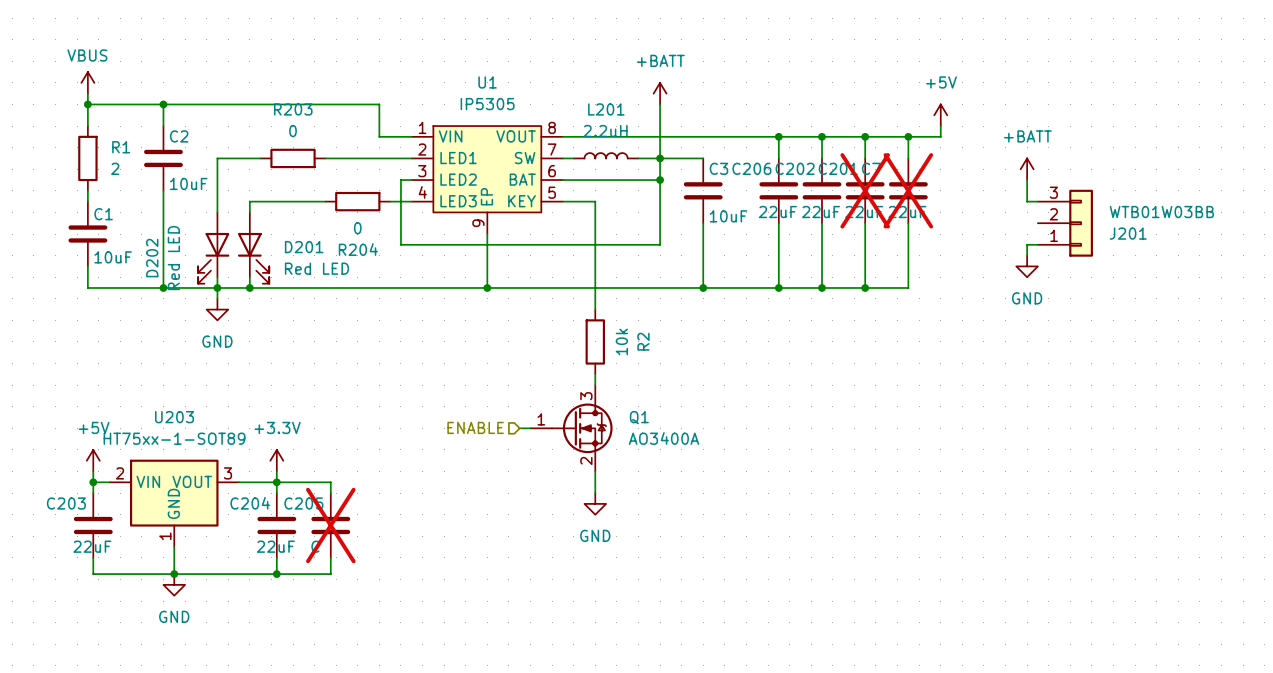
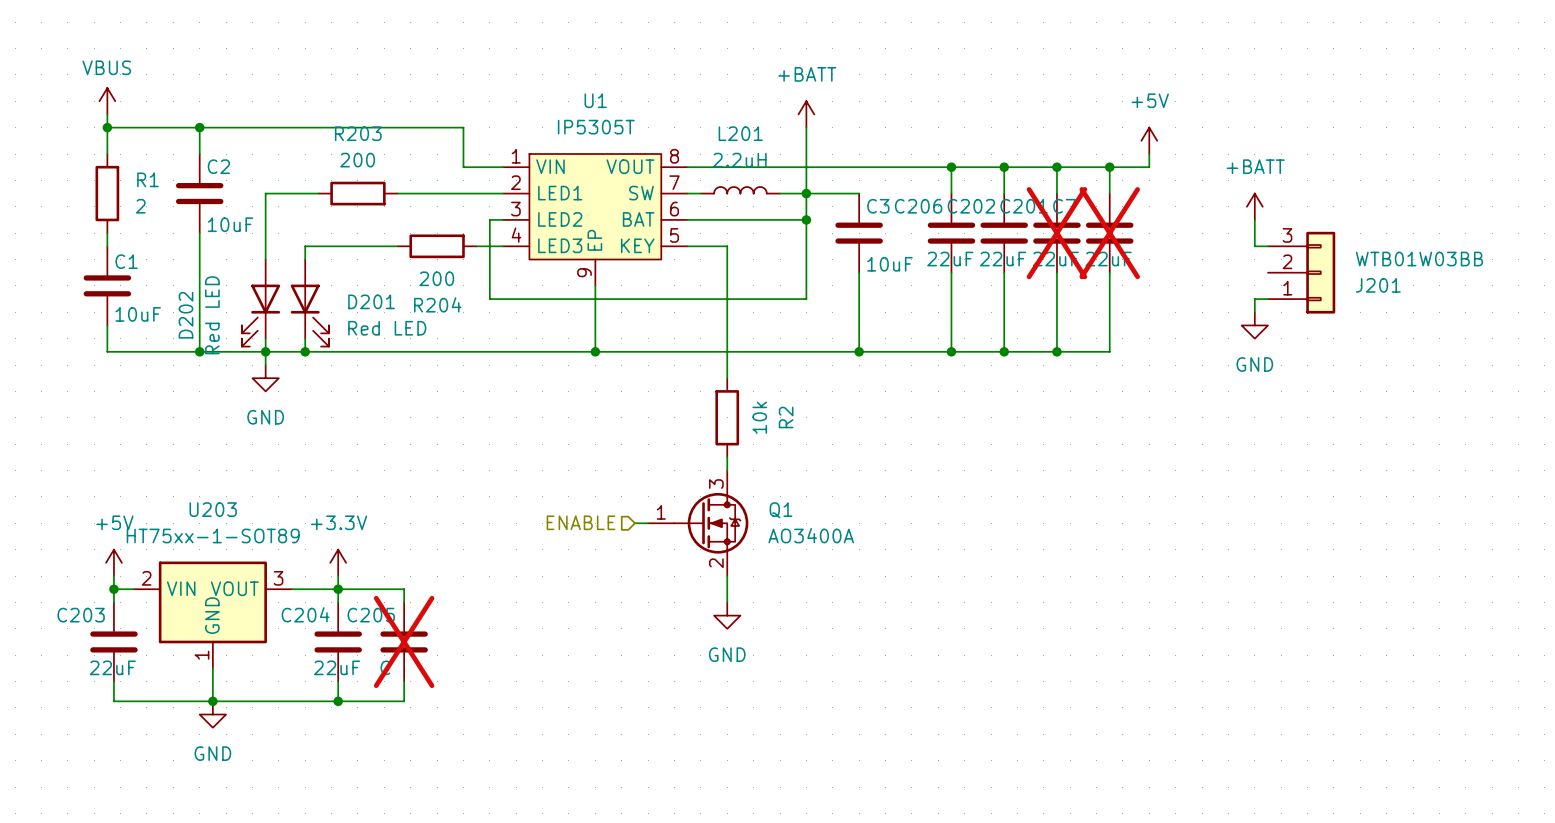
U1 value: IP5305 (487, 104) -> IP5305T (596, 127)
R203 value: 0 (293, 131) -> 200 (357, 160)
R204 value: 0 (357, 228) -> 200 (436, 278)

